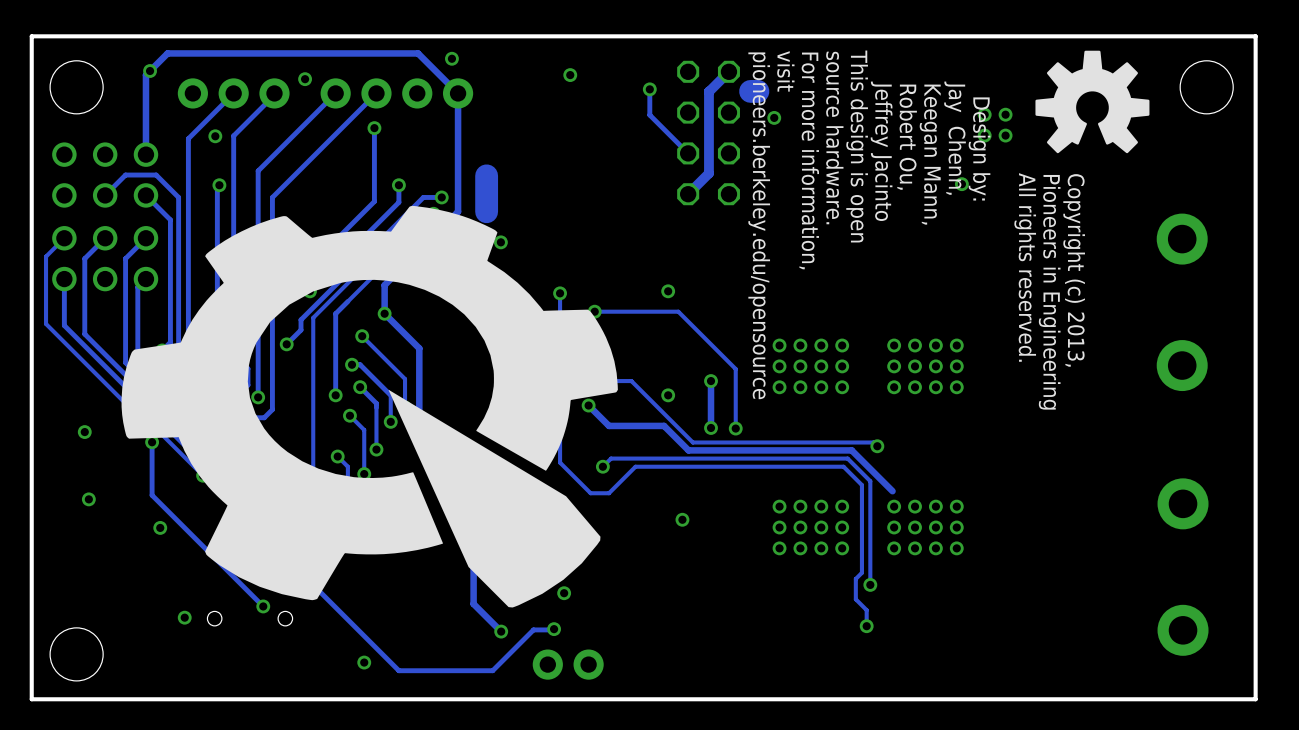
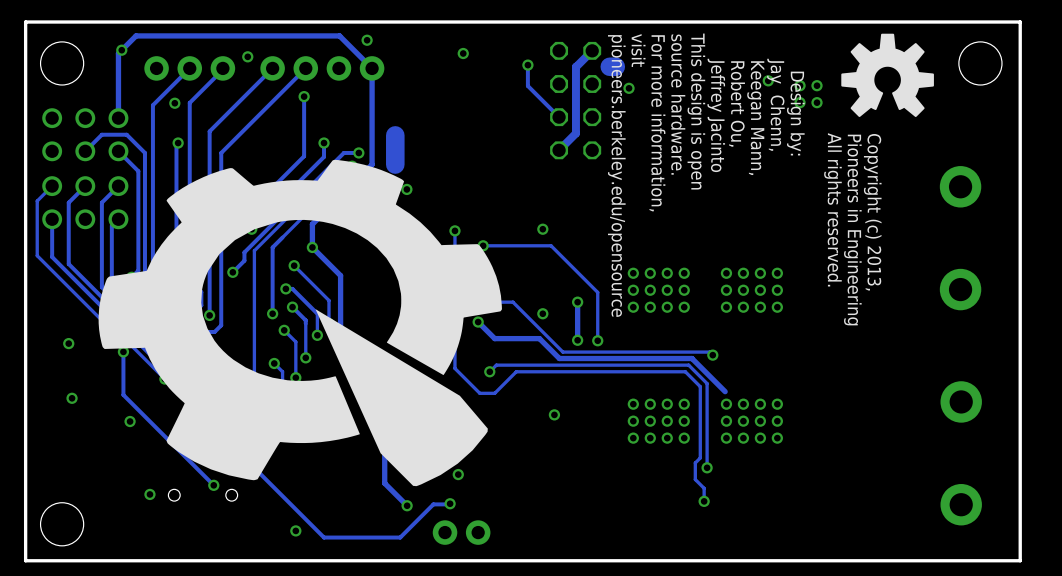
via position: (961, 184) -> (768, 80)

